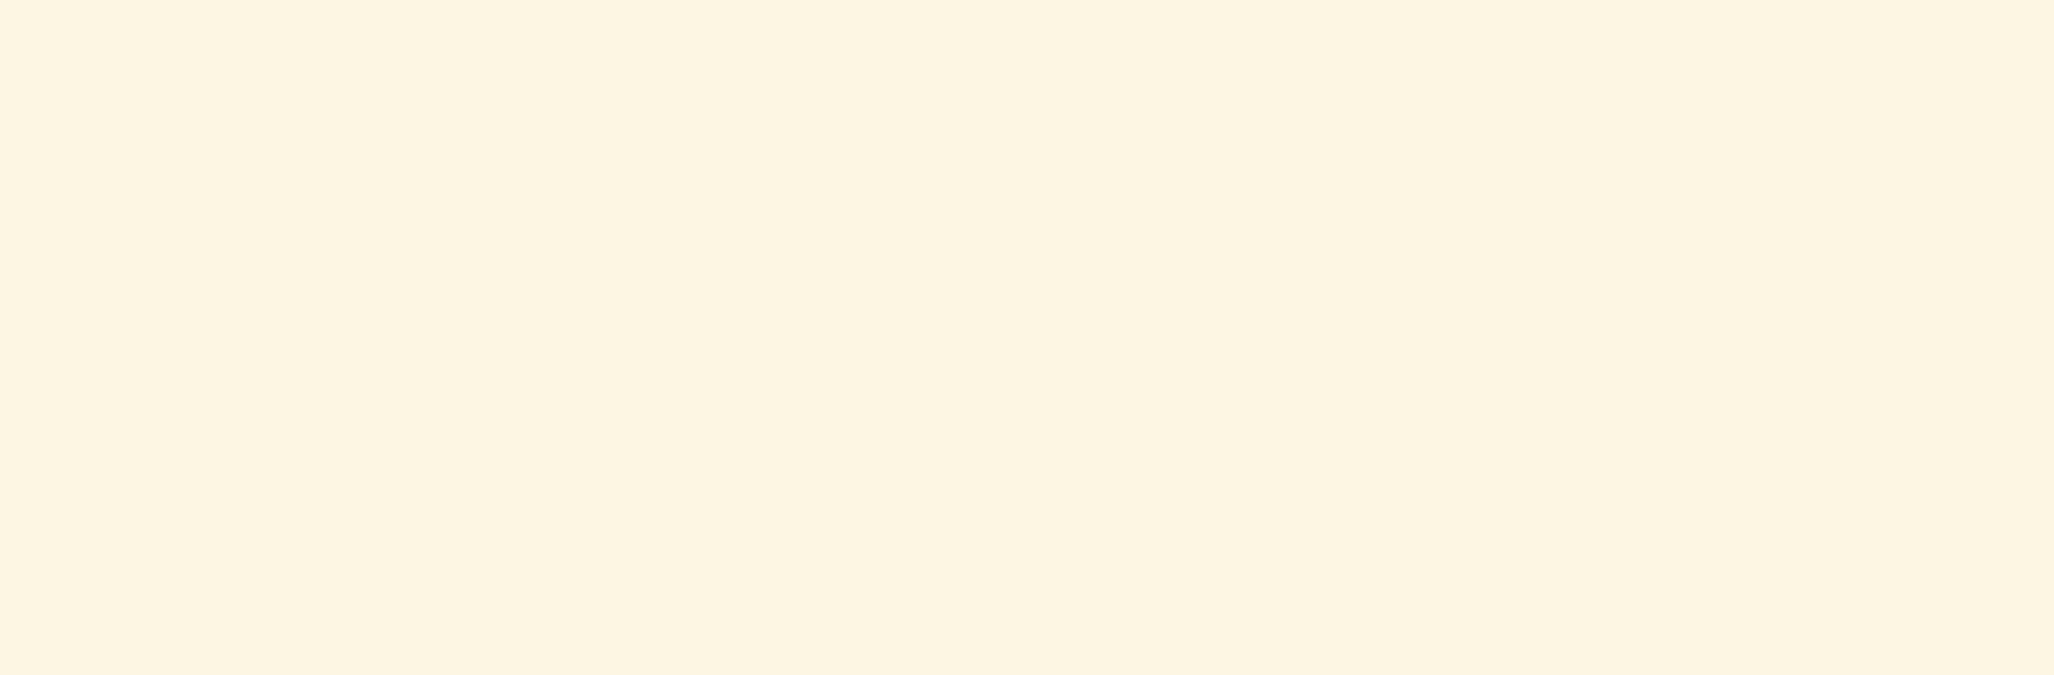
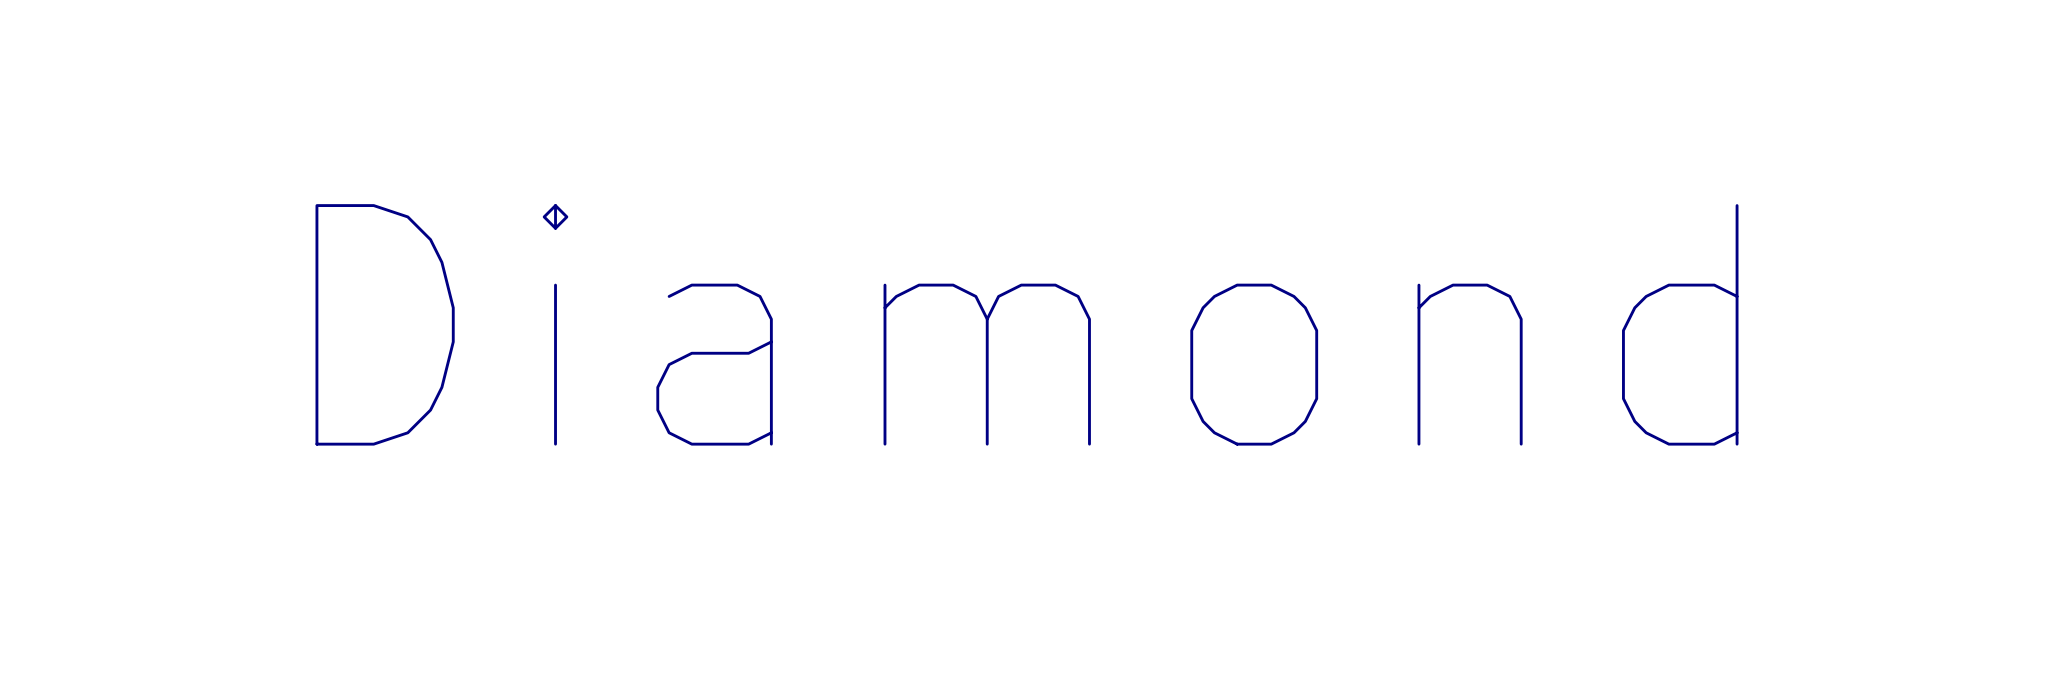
text: none -> Diamond (1027, 324)

